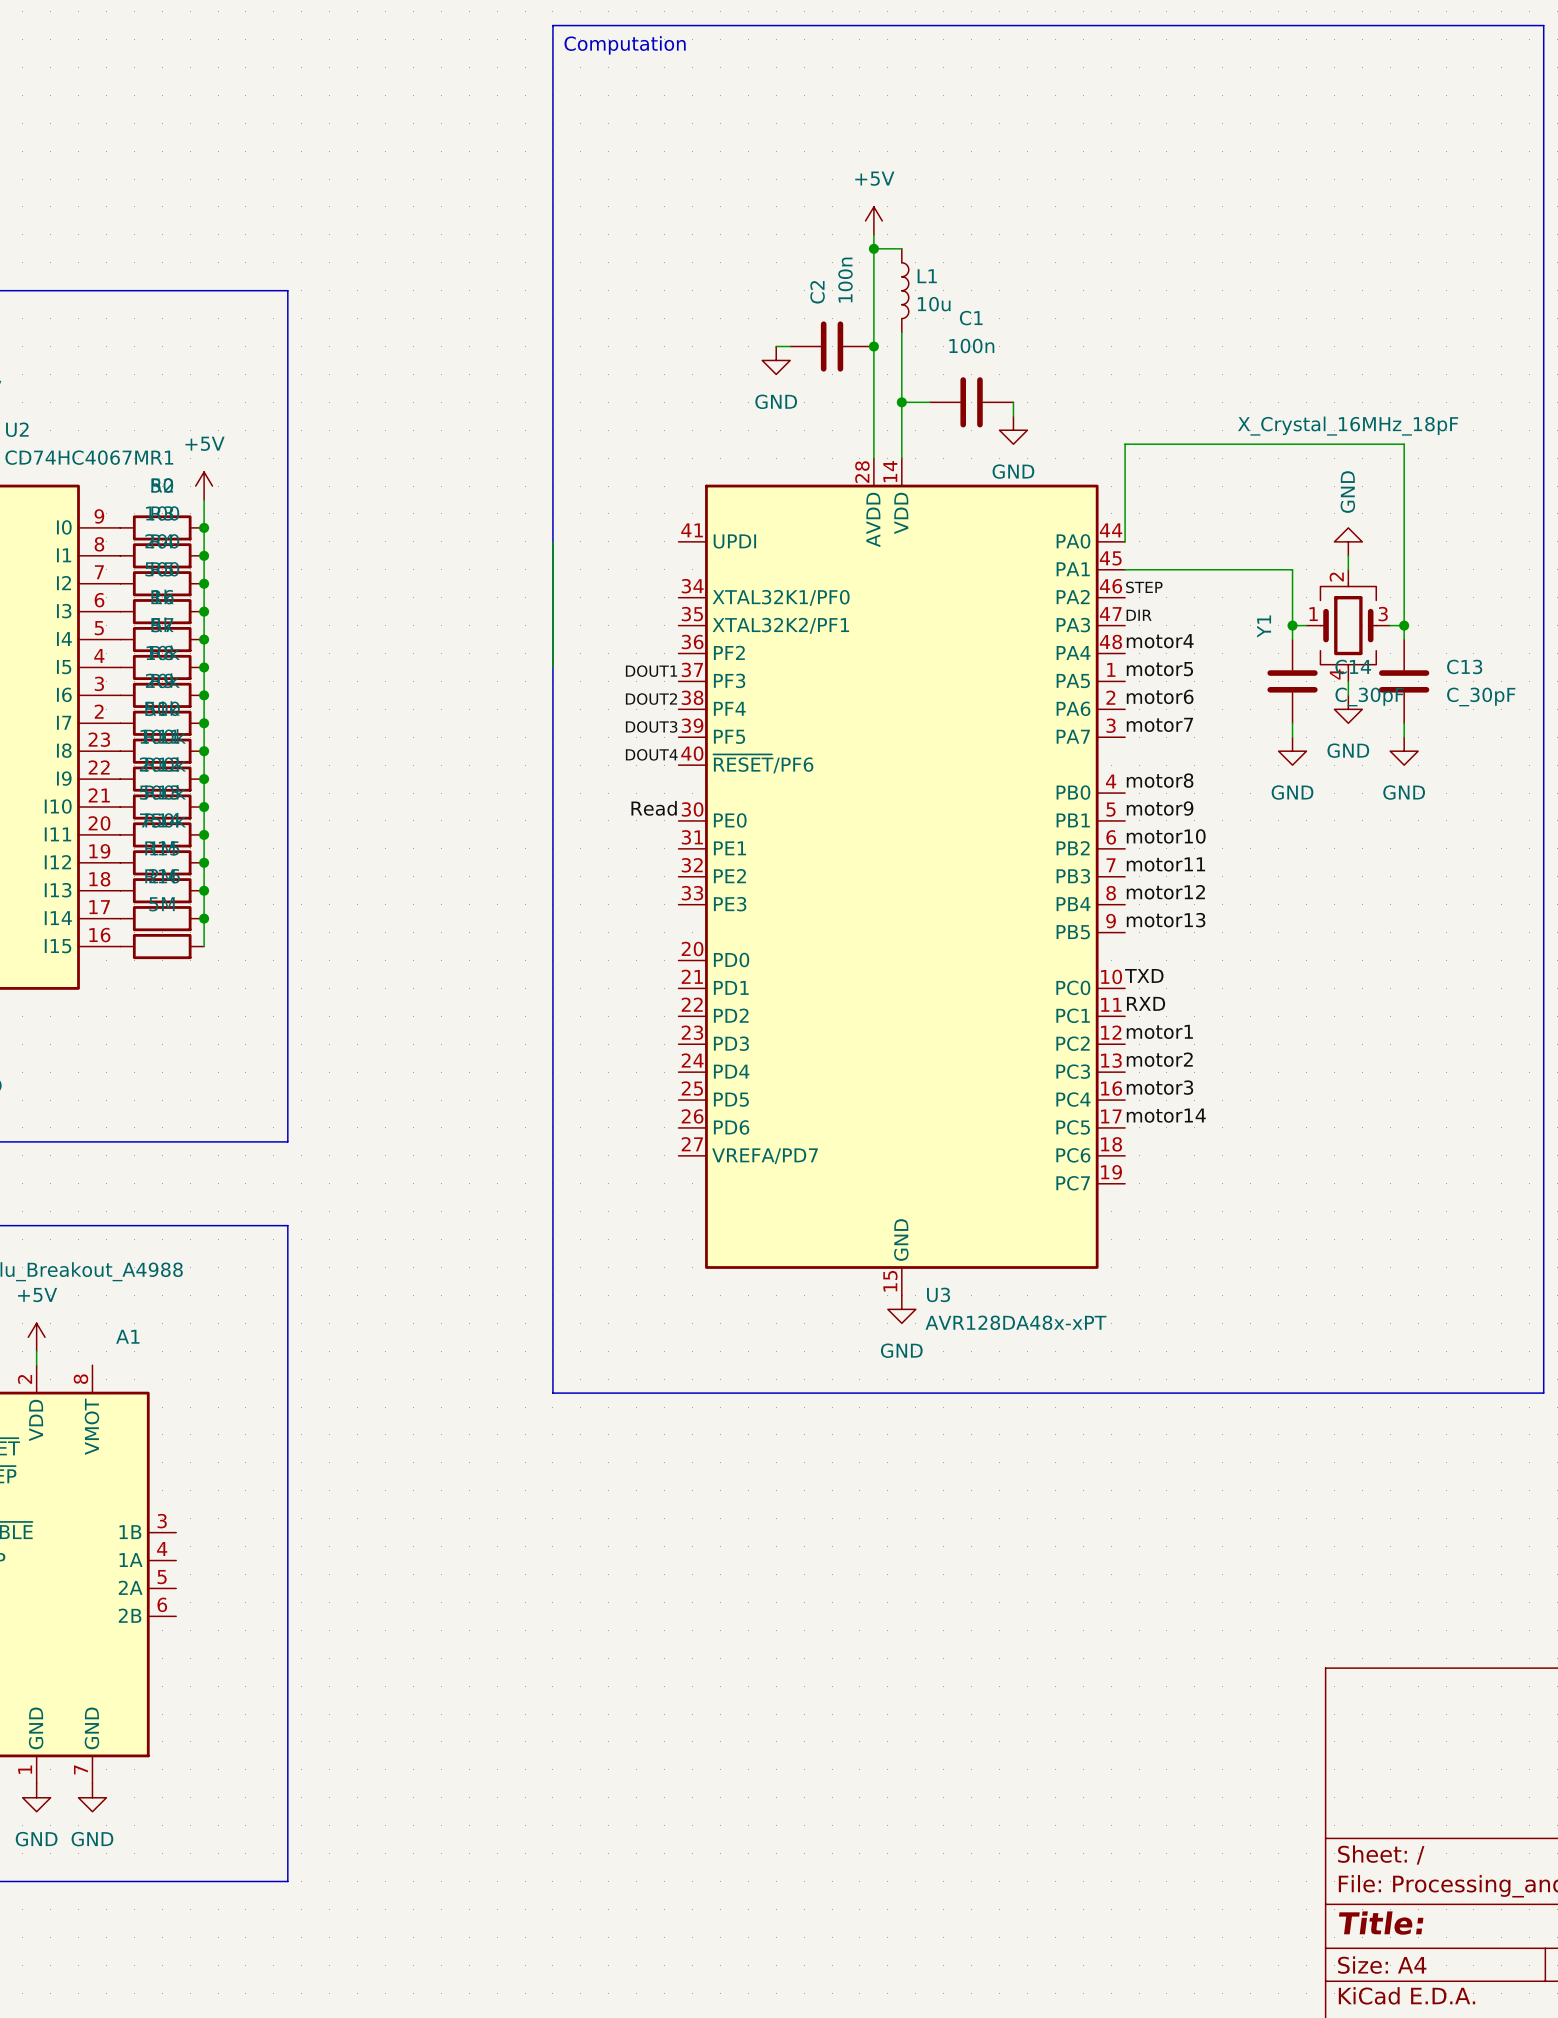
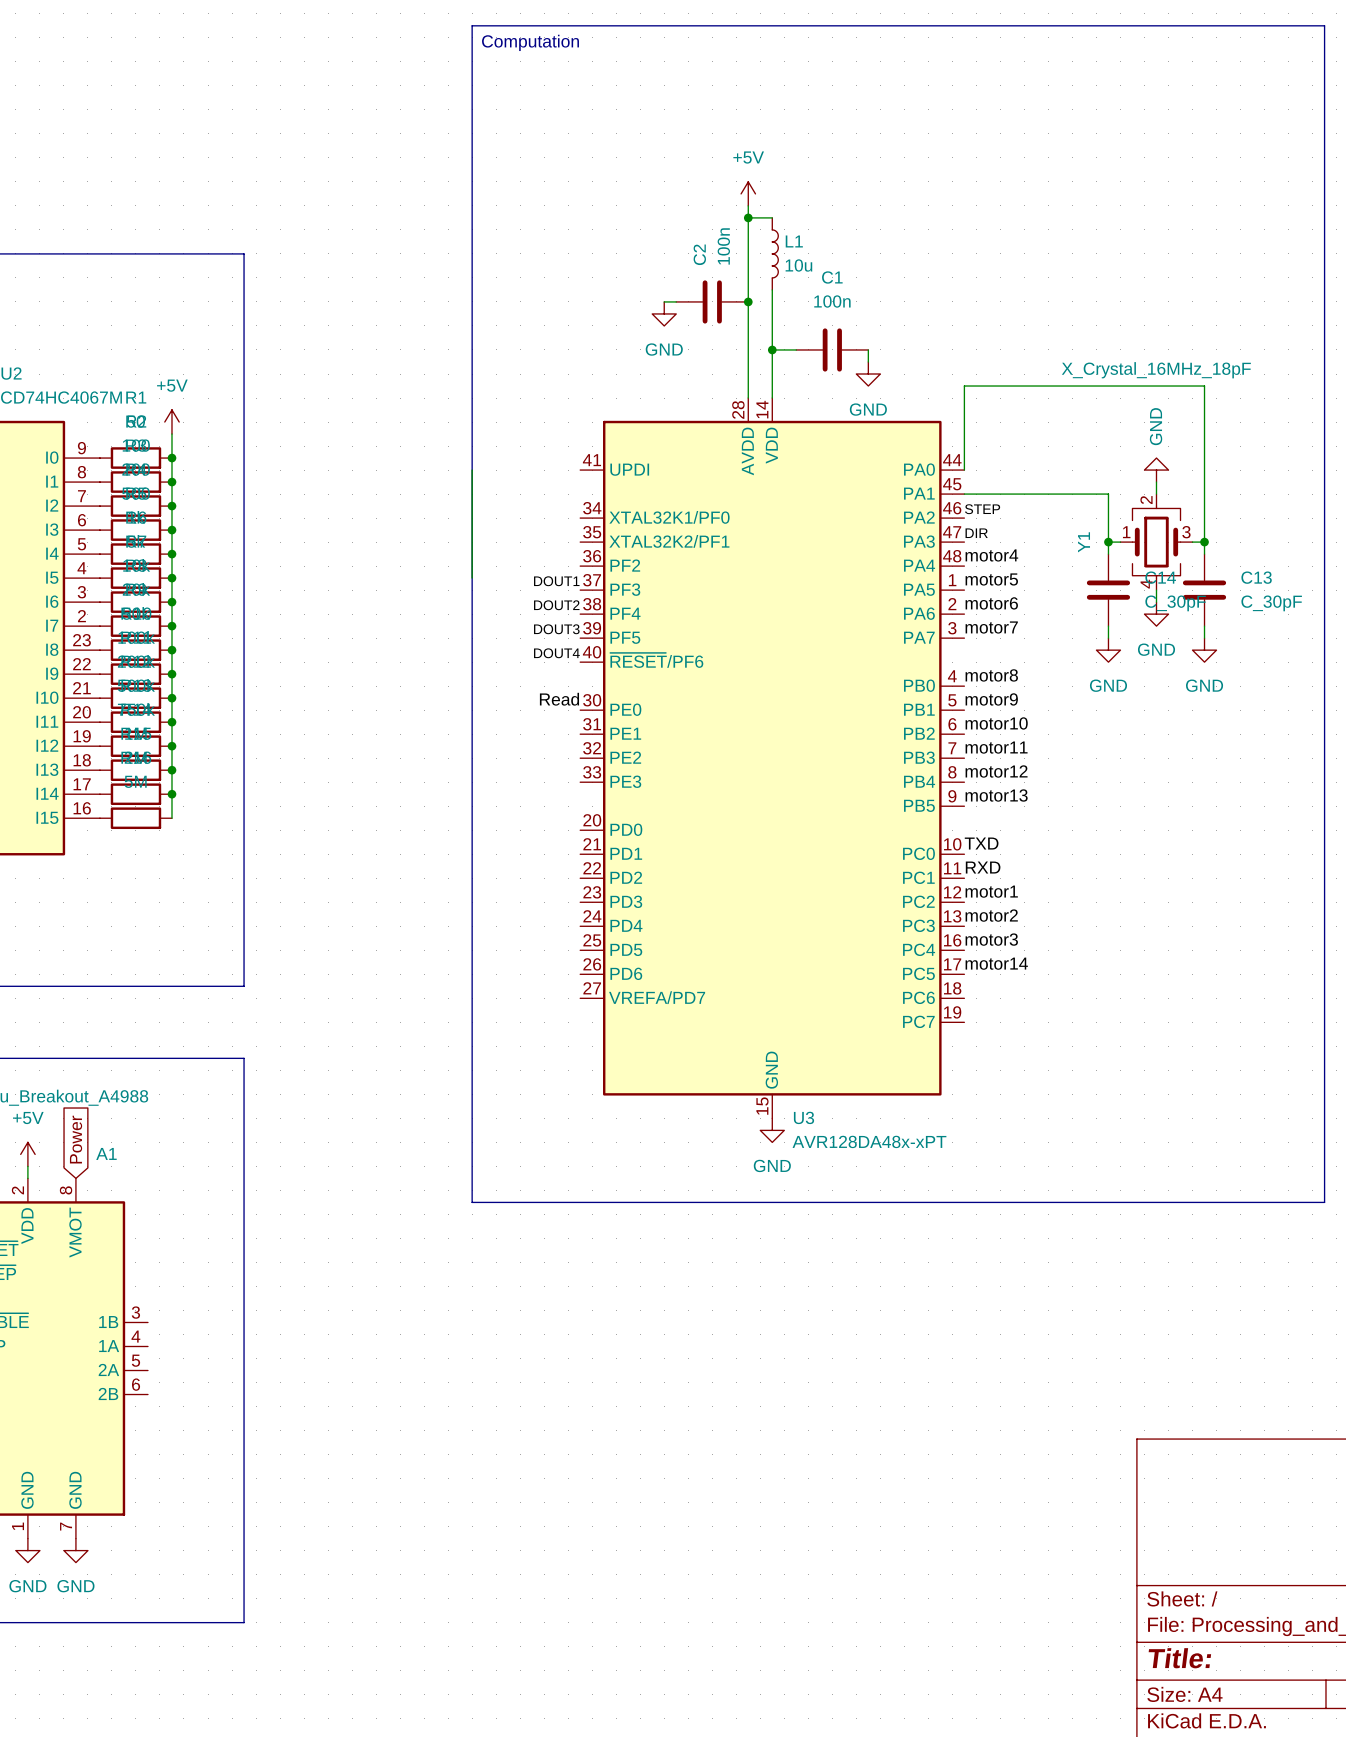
global label: none -> Power (76, 1139)

